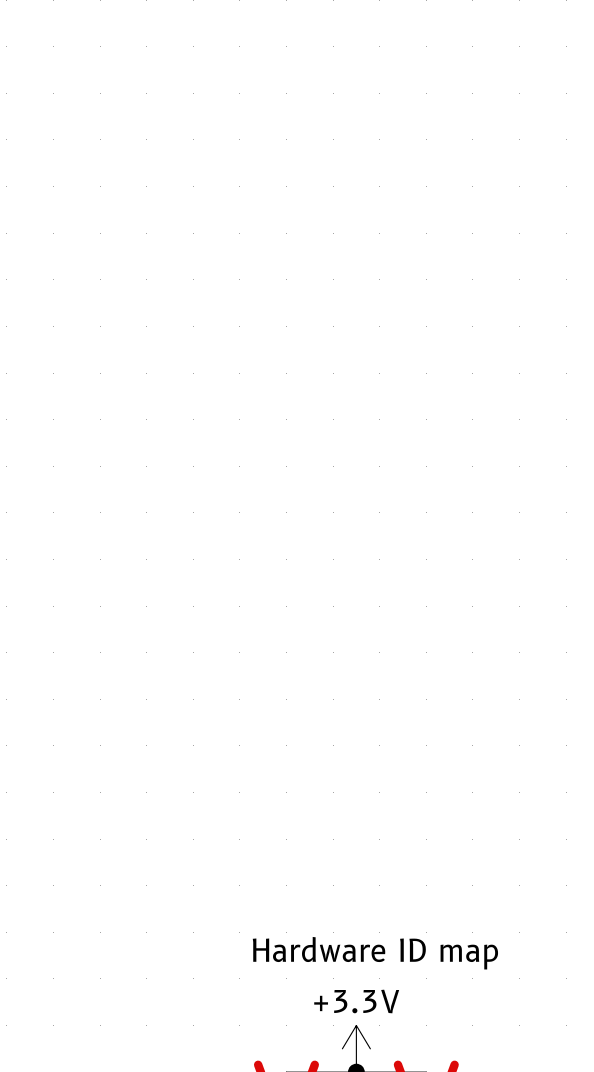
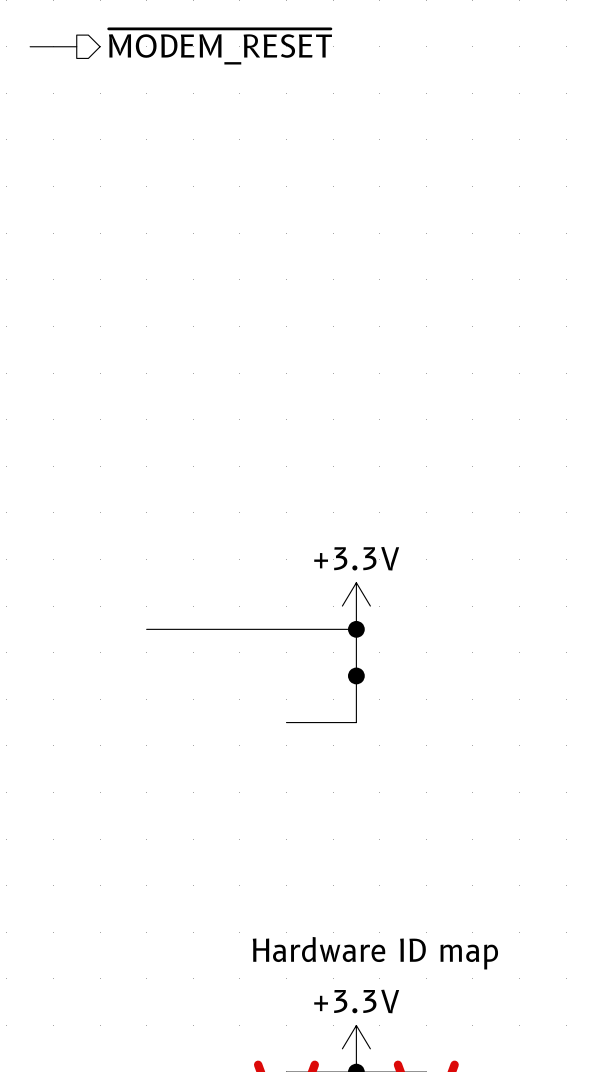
wire: none -> (30, 46) (76, 46)
hierarchical label: none -> ~{MODEM_RESET} (220, 46)
power symbol: none -> +3.3V (356, 606)
wire: none -> (146, 629) (356, 629) (356, 722) (286, 722)
junction: none -> (356, 629)
junction: none -> (356, 675)

